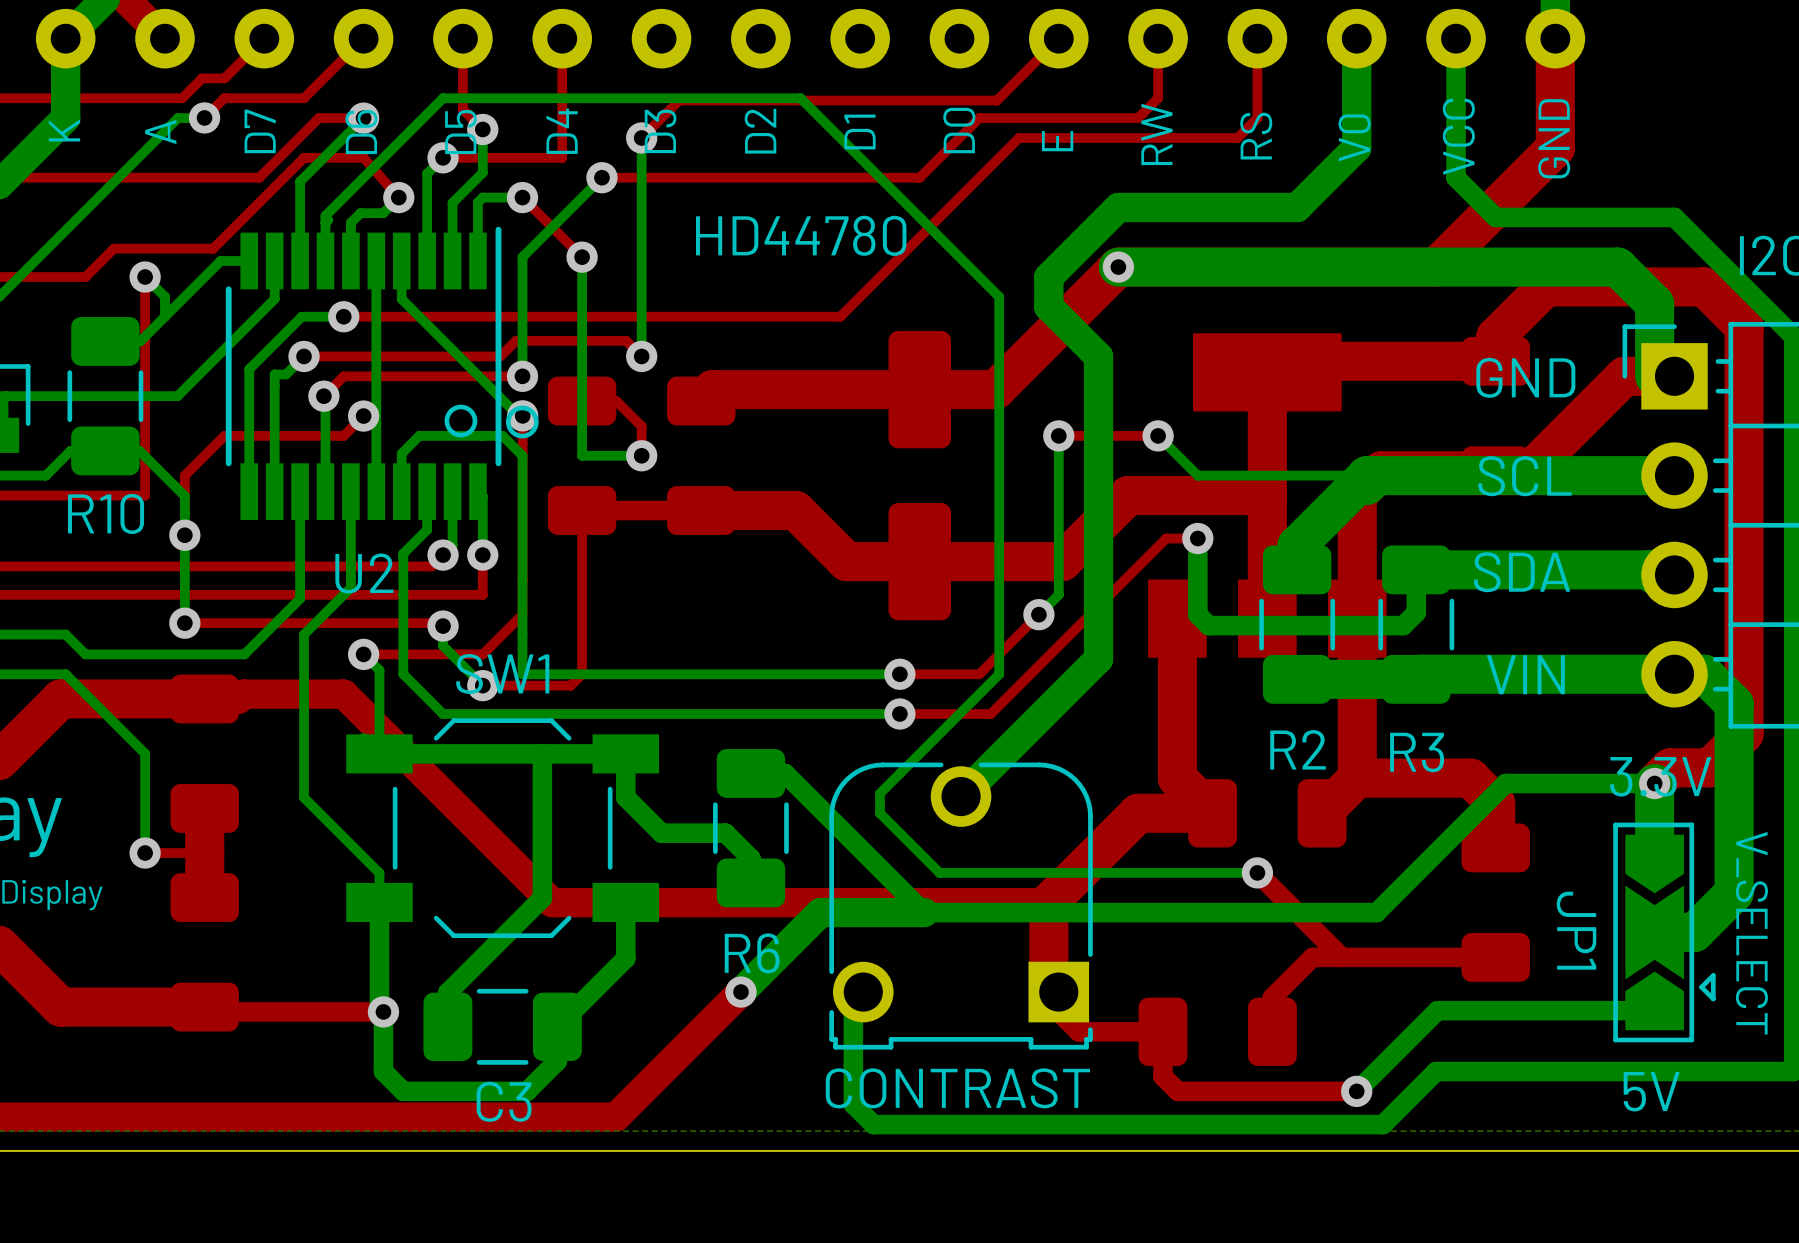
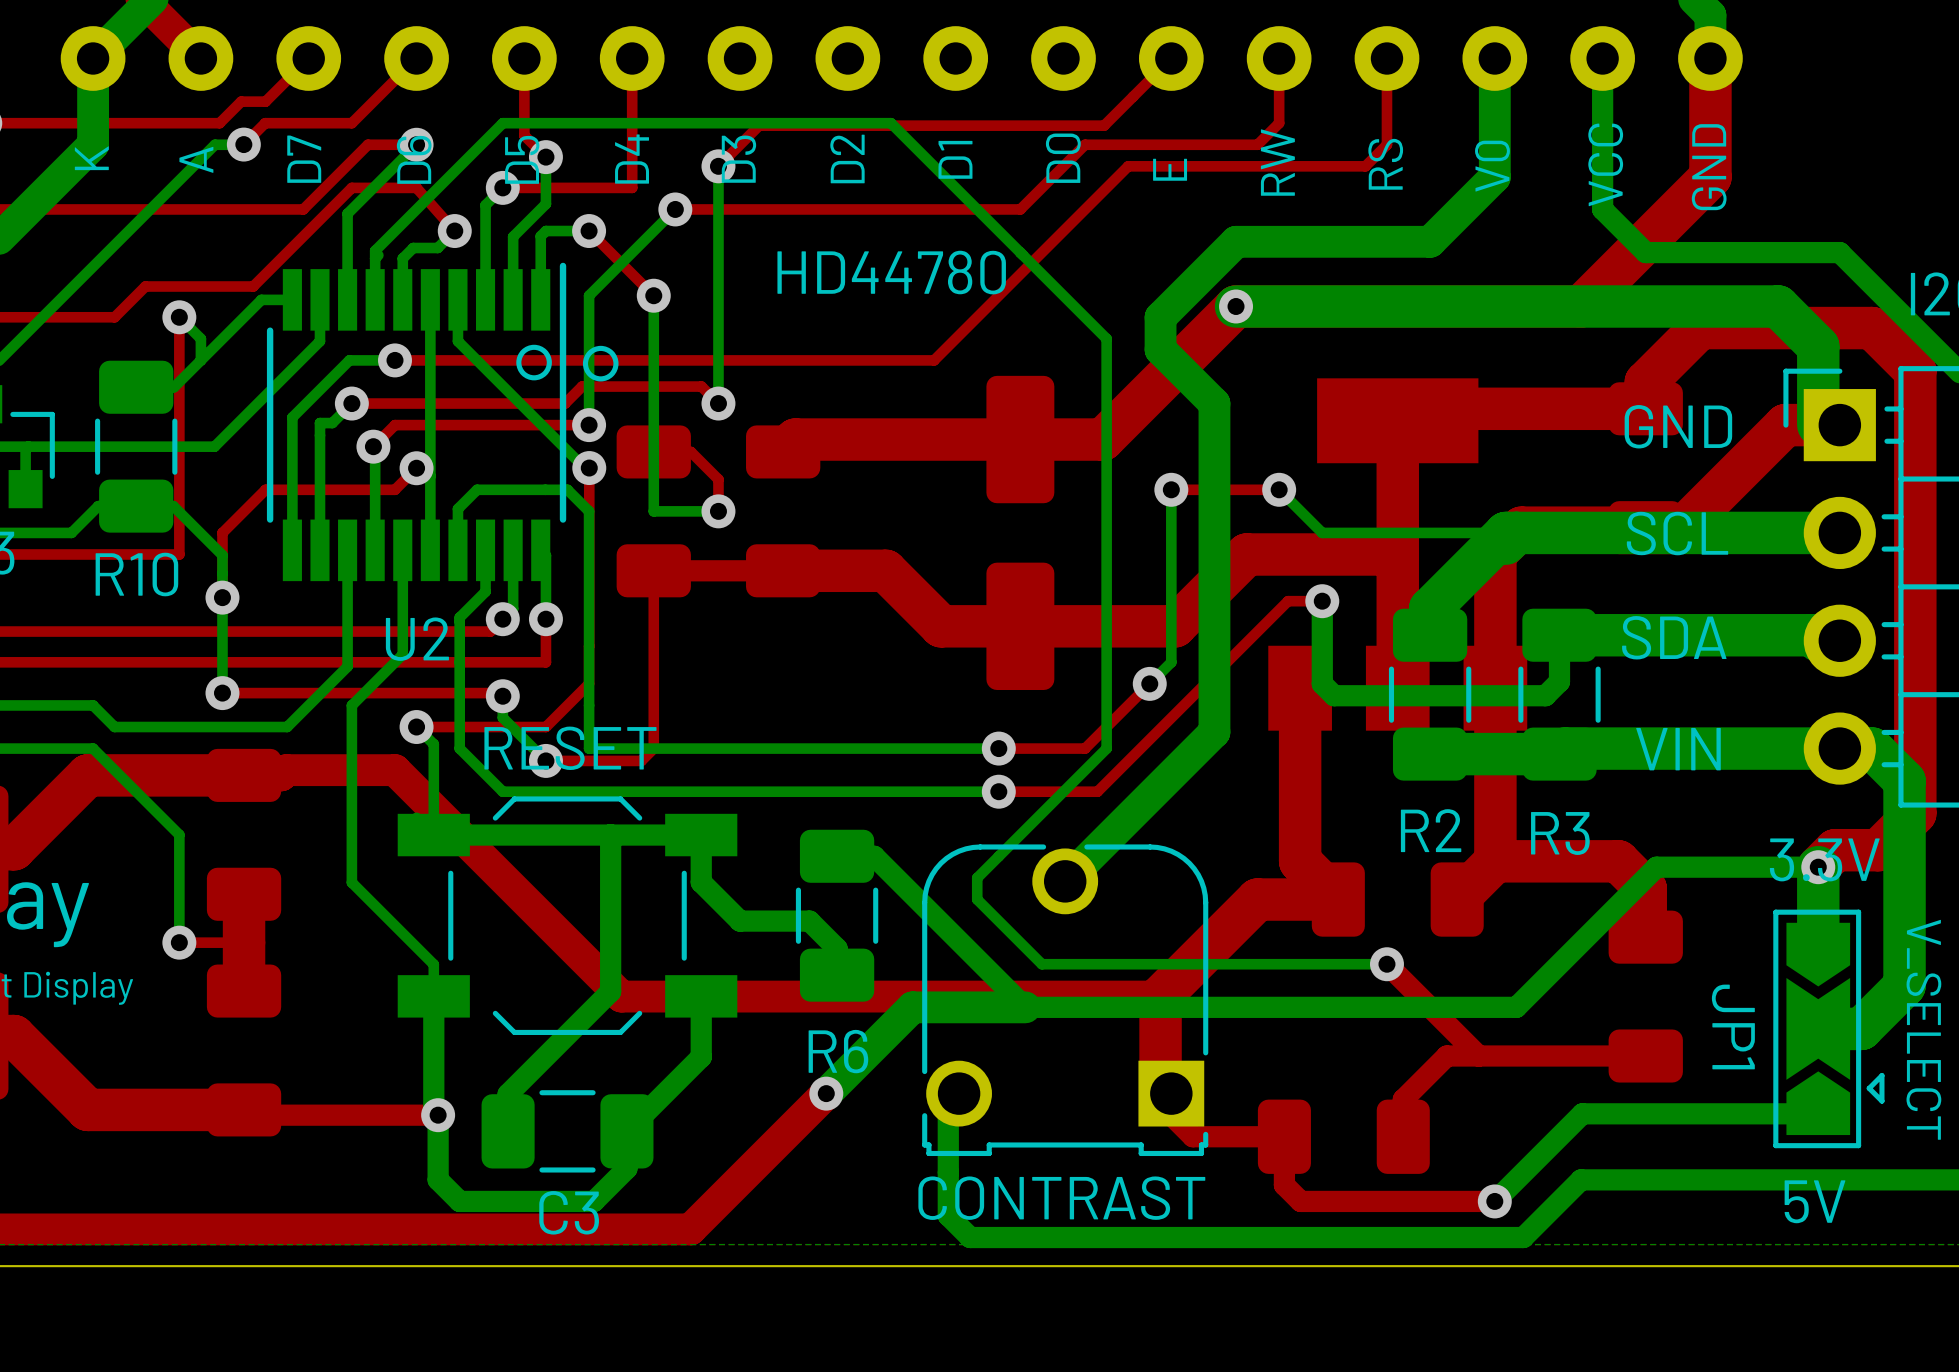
drawing: none -> [516, 344, 619, 382]
drawing: [444, 404, 539, 439] -> none
SW1 name: SW1 (502, 673) -> RESET (570, 748)

